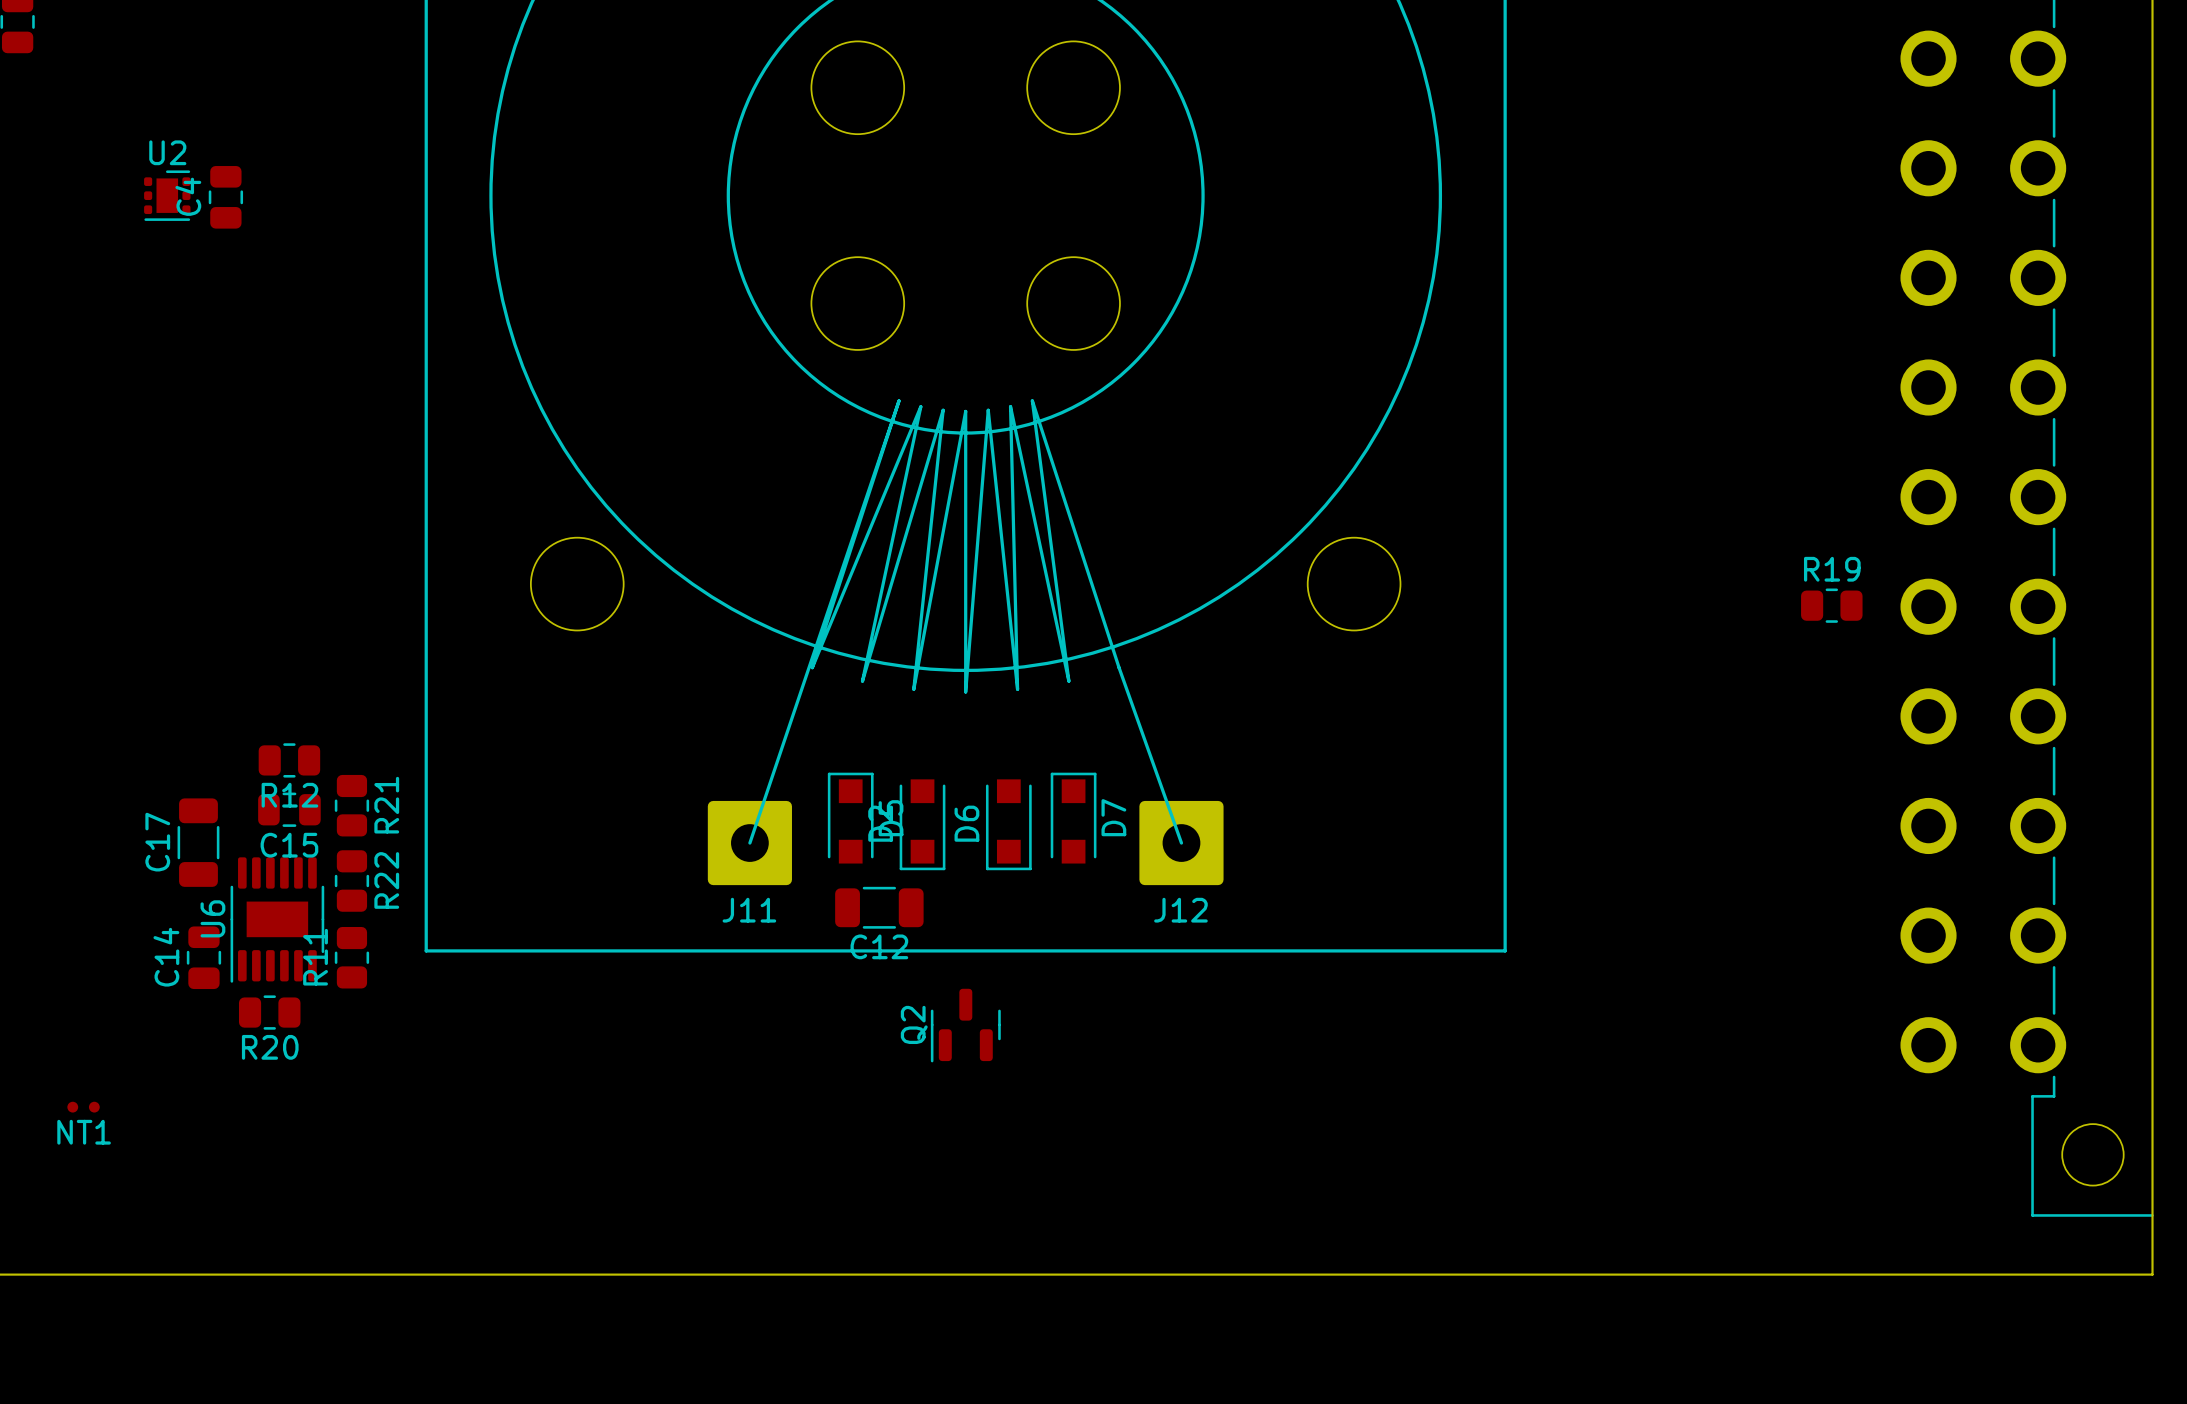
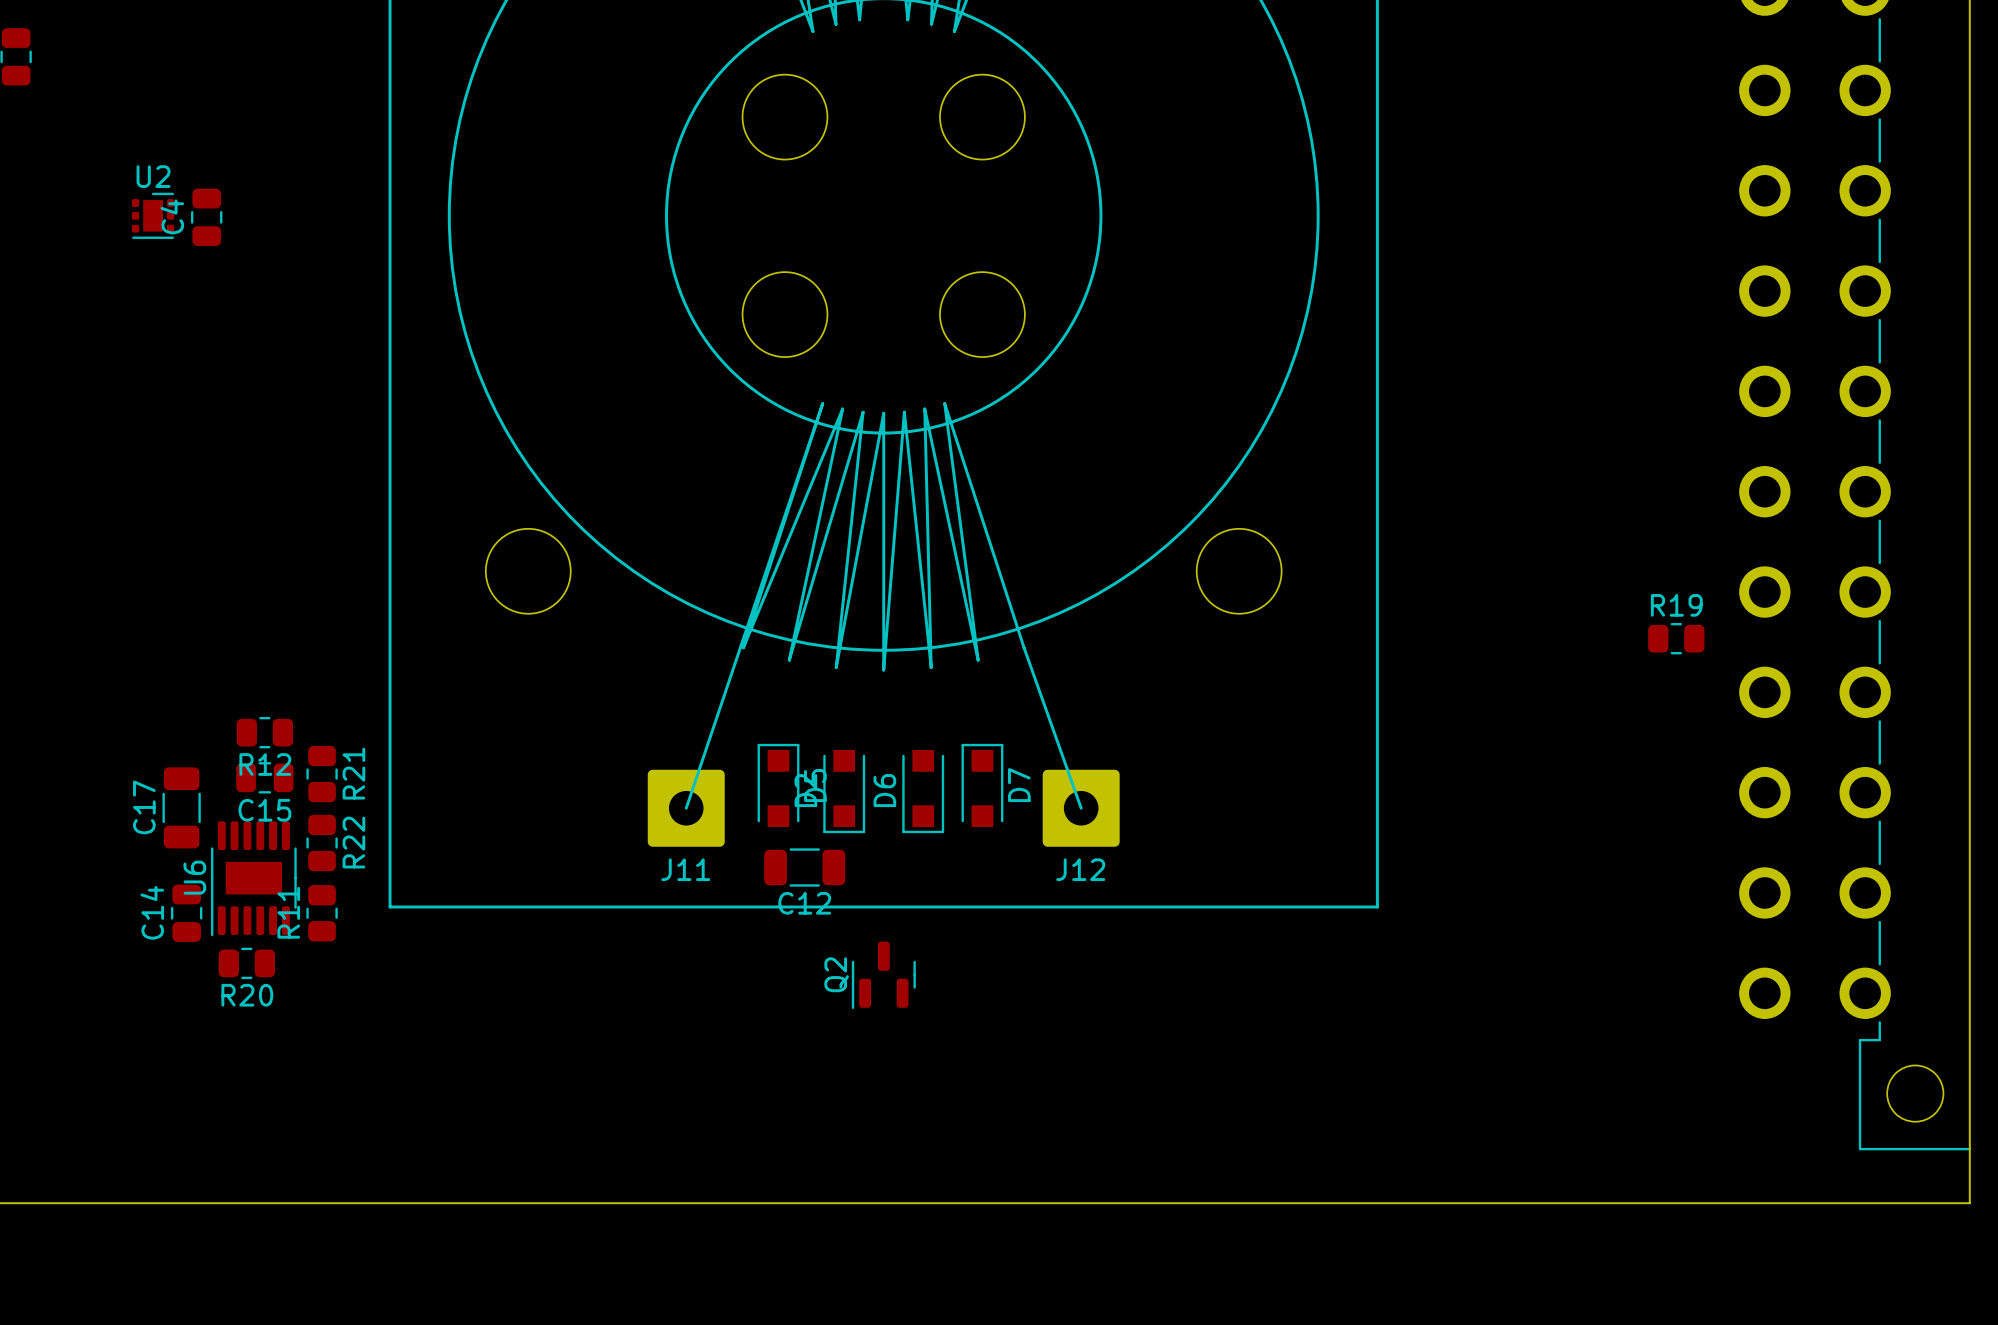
R19 position: (1831, 605) -> (1676, 638)
NT1: (83, 1107) -> none

